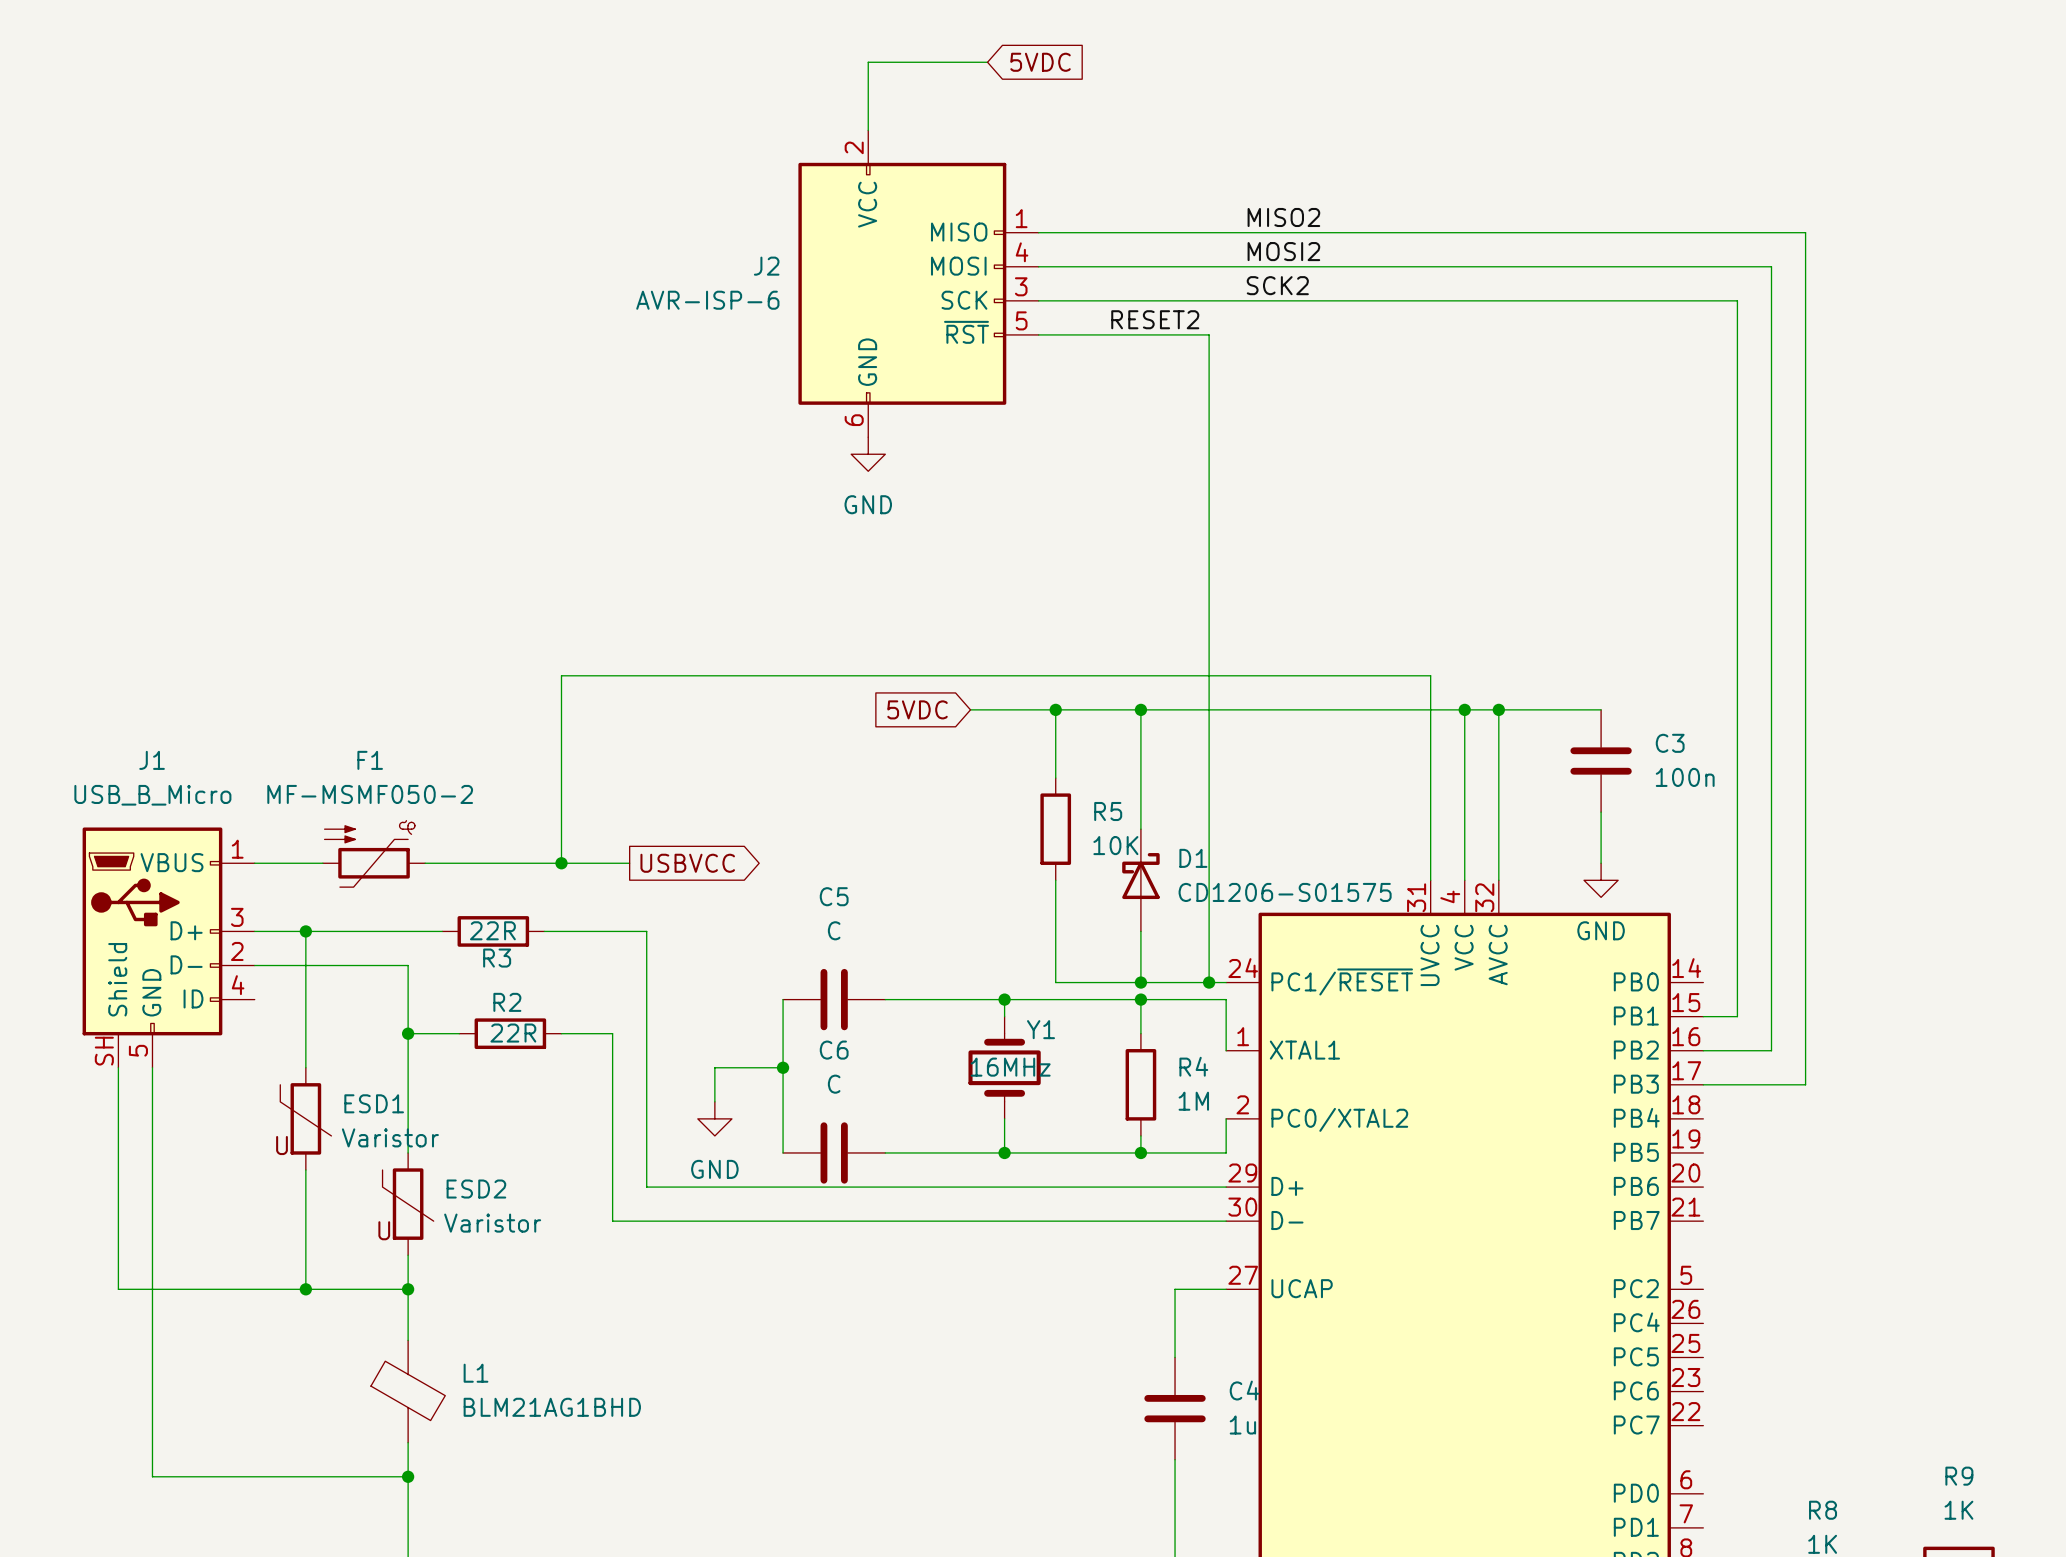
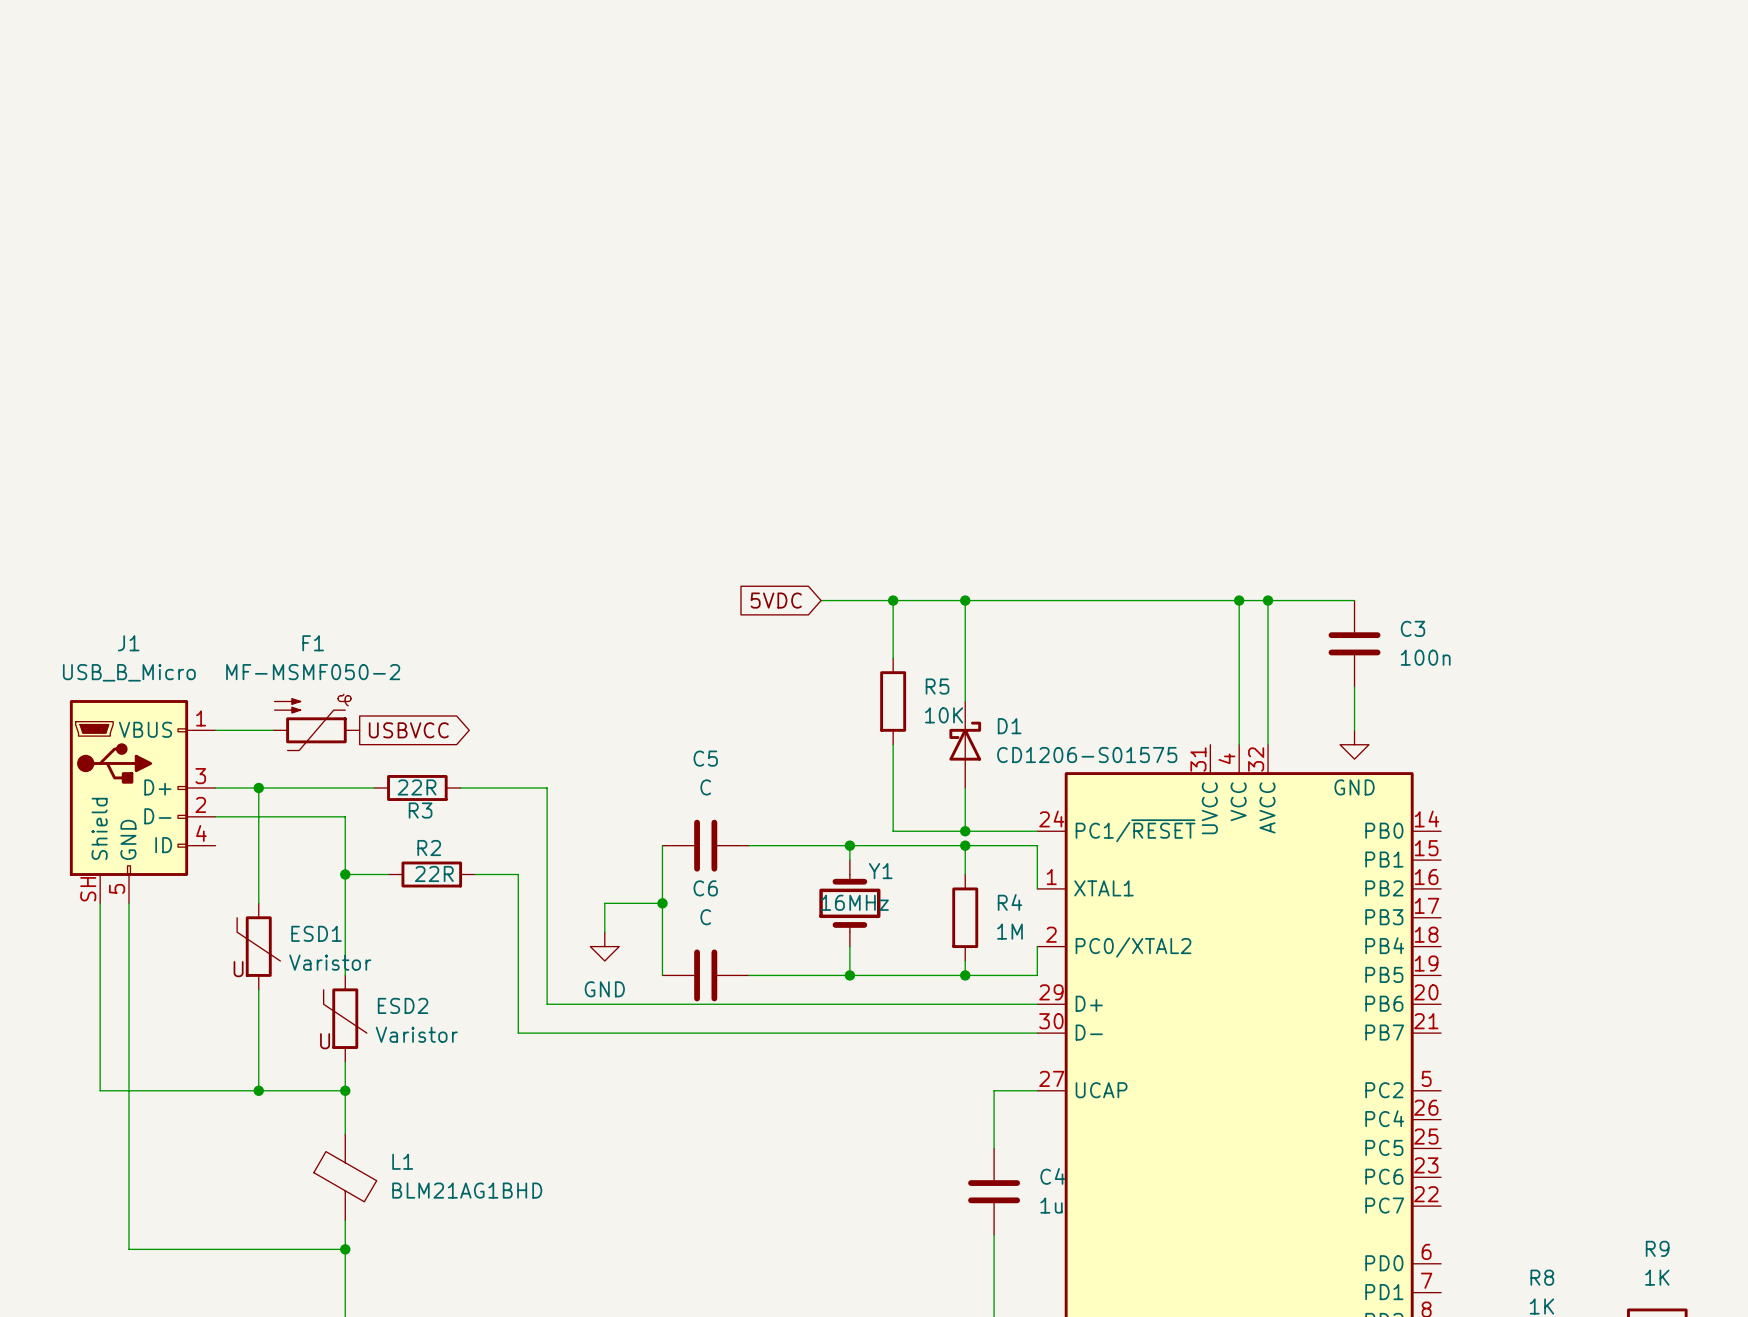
wire: (987, 62) (868, 62) (868, 130) -> none
global label: 5VDC (1040, 62) -> none
label: MISO2 (1283, 217) -> none
wire: (1038, 232) (1805, 232) (1805, 1084) (1703, 1084) -> none
label: MOSI2 (1283, 251) -> none
wire: (1038, 266) (1771, 266) (1771, 1050) (1703, 1050) -> none
J2: AVR-ISP-6 (918, 283) -> none
label: SCK2 (1277, 285) -> none
wire: (1038, 300) (1737, 300) (1737, 1016) (1703, 1016) -> none
label: RESET2 (1155, 319) -> none
wire: (1038, 334) (1209, 334) (1209, 982) -> none
power symbol: GND (868, 454) -> none
wire: (425, 863) (629, 863) -> none
wire: (561, 863) (561, 675) (1430, 675) (1430, 880) -> none
junction: (561, 863) -> none
global label position: USBVCC (687, 863) -> USBVCC (408, 730)
junction: (1209, 982) -> none

